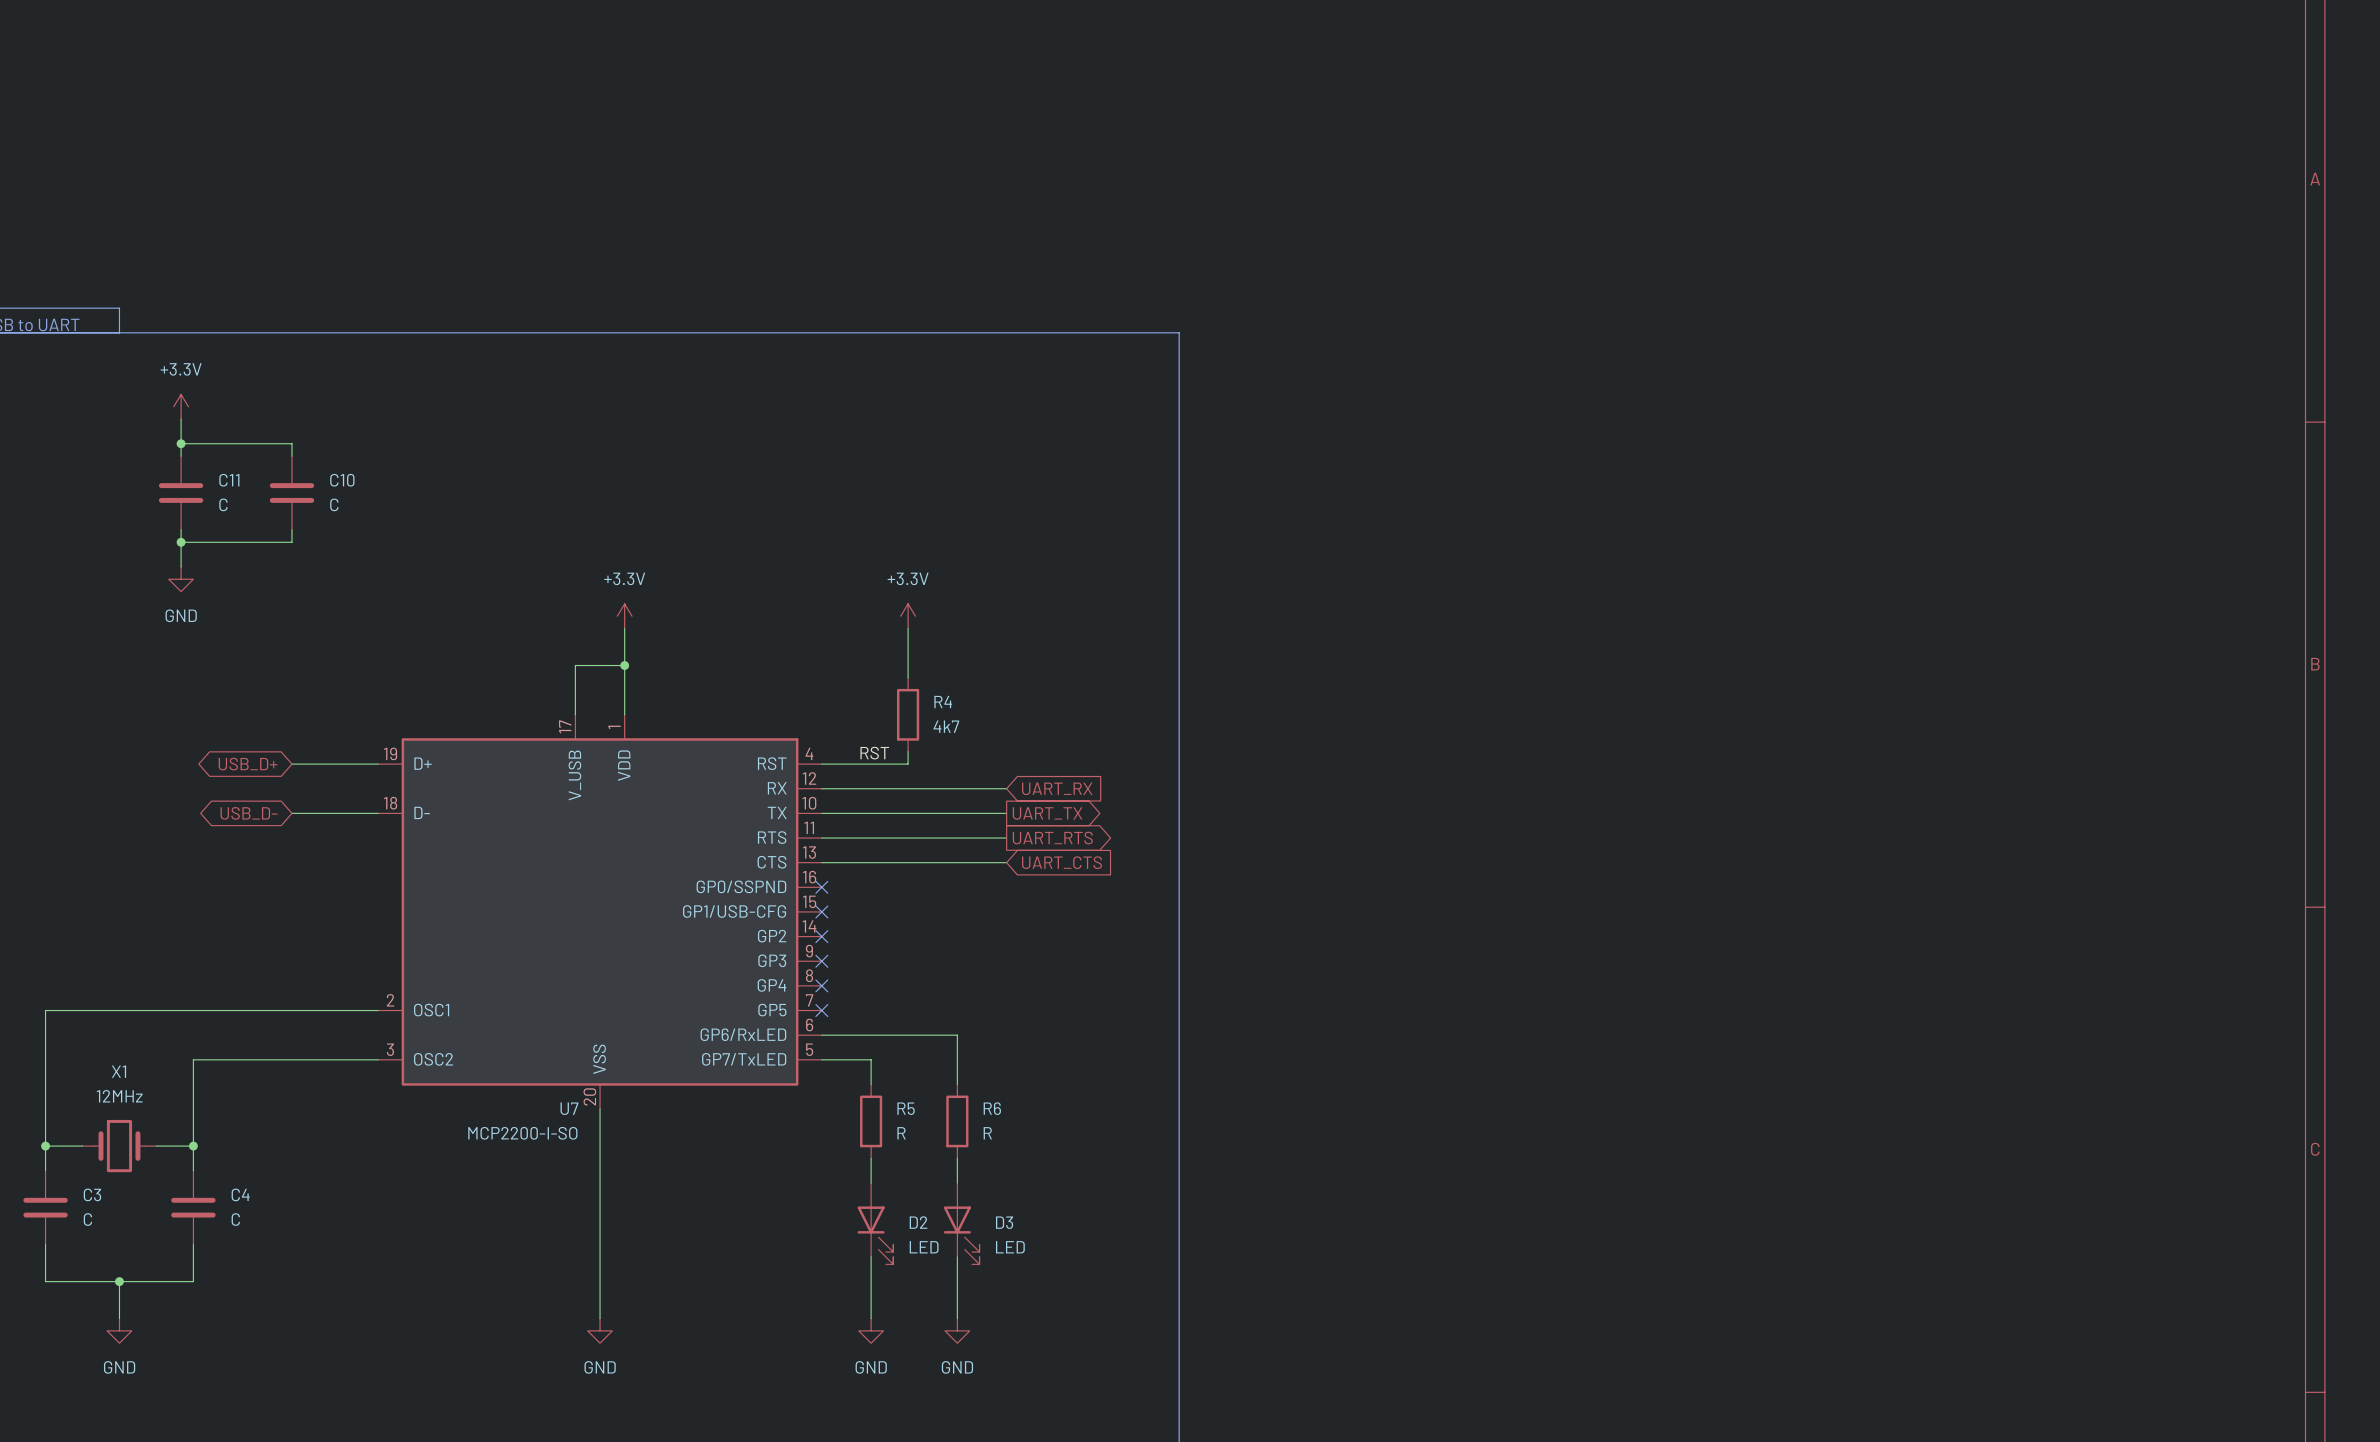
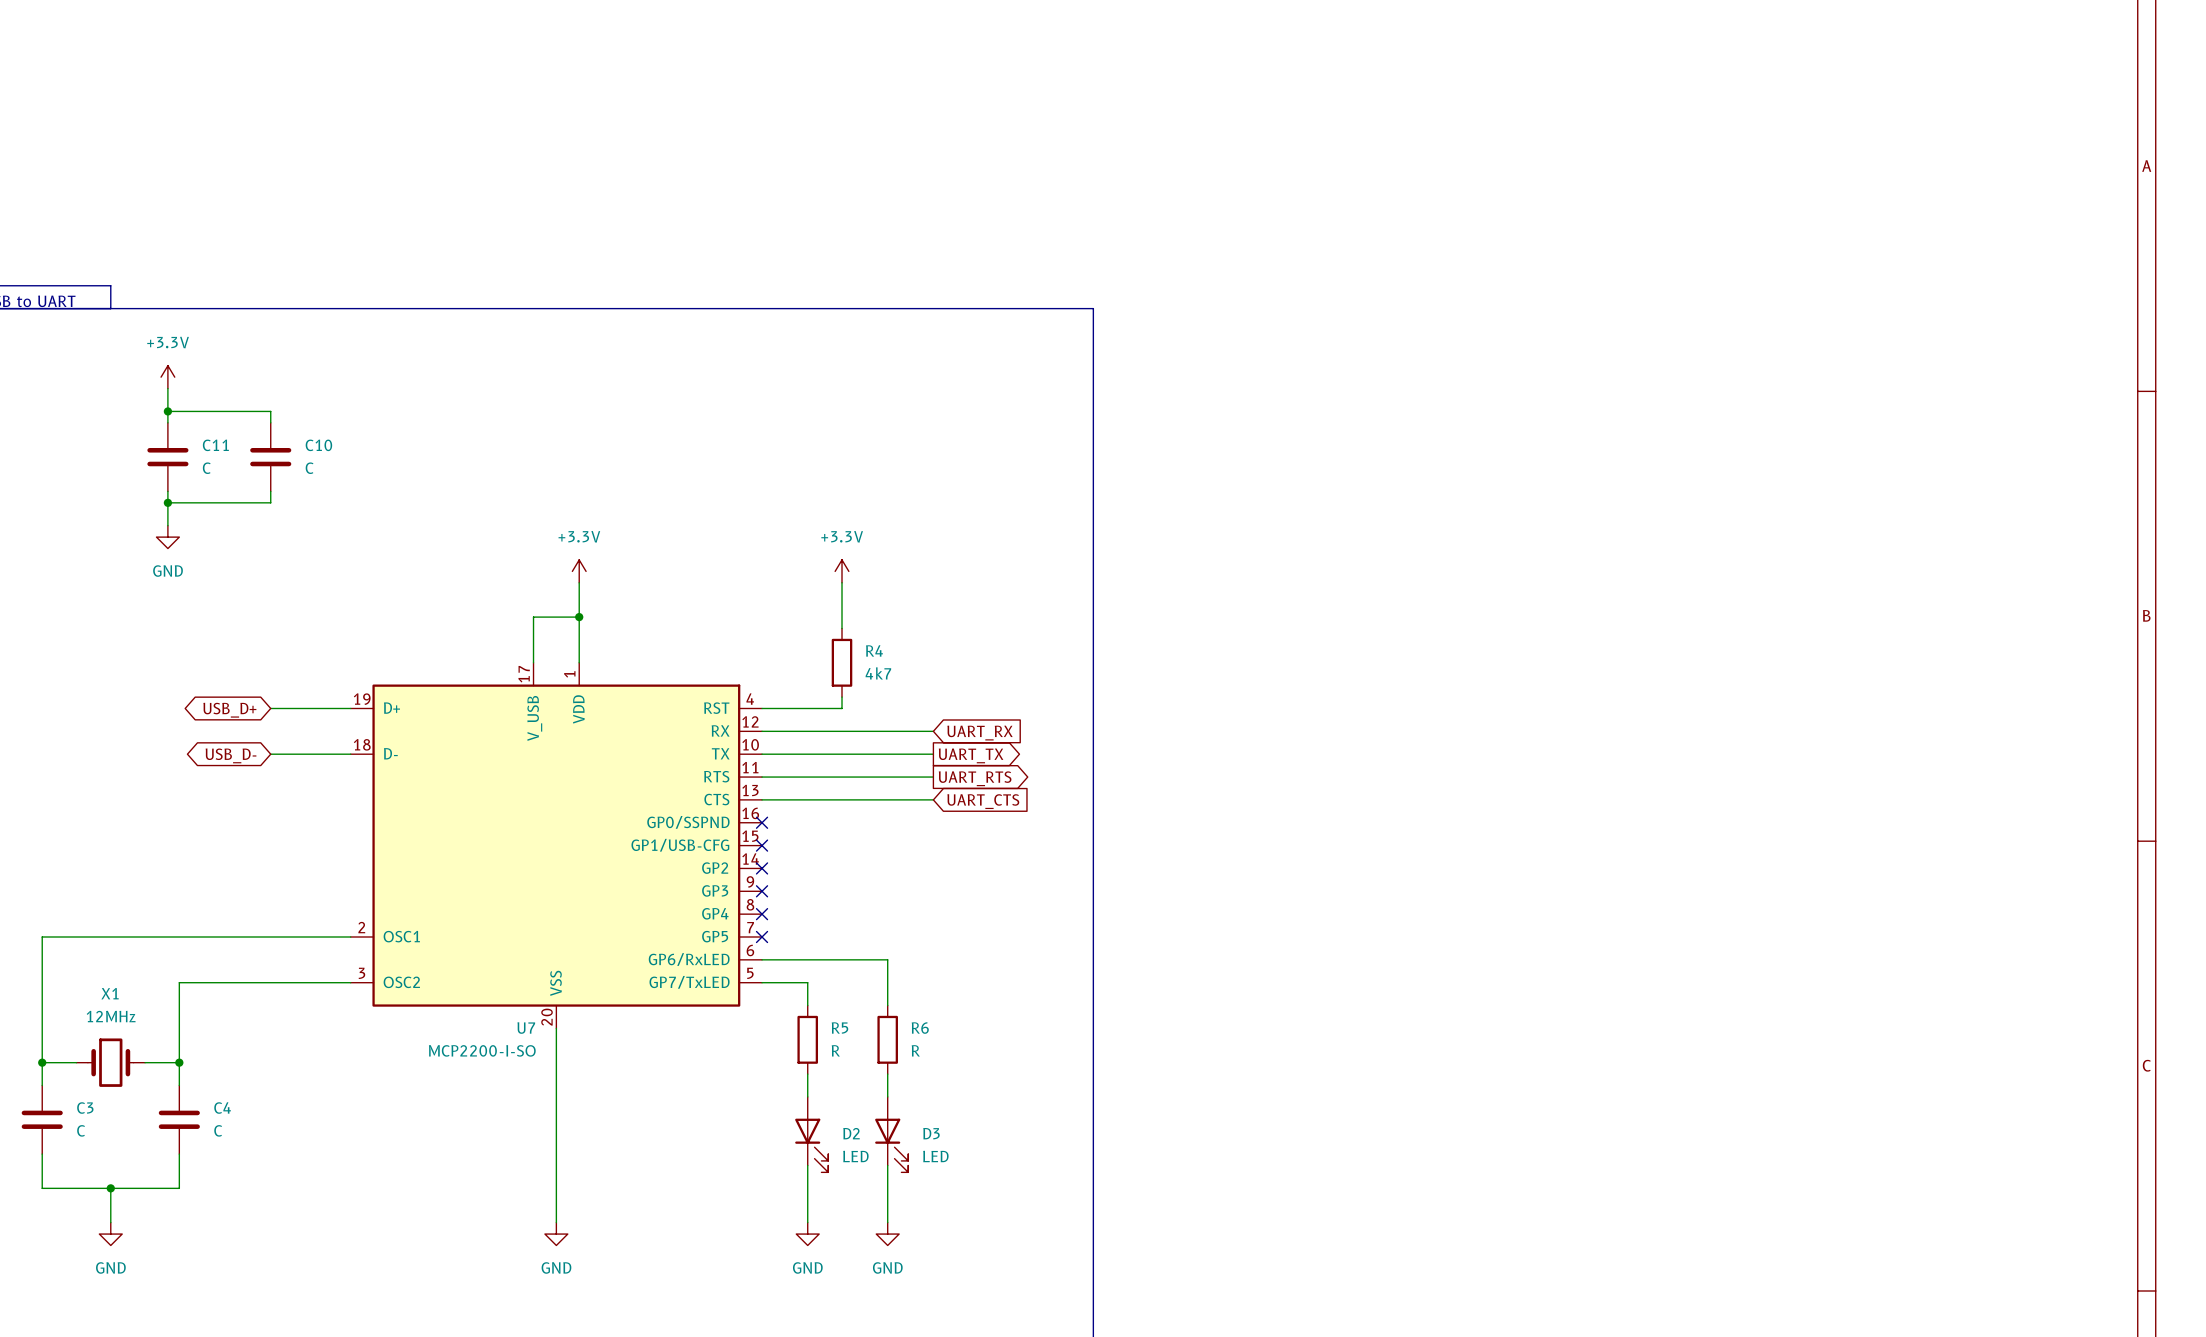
label: RST (874, 753) -> none

